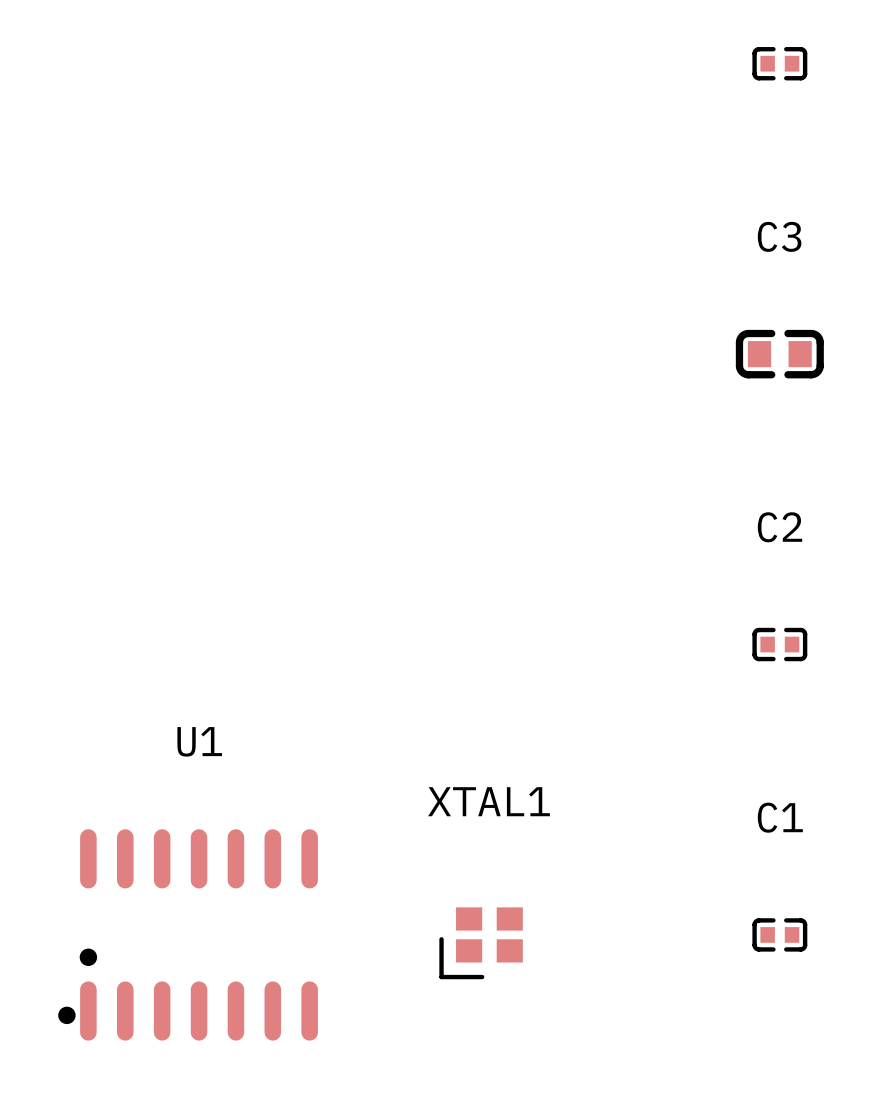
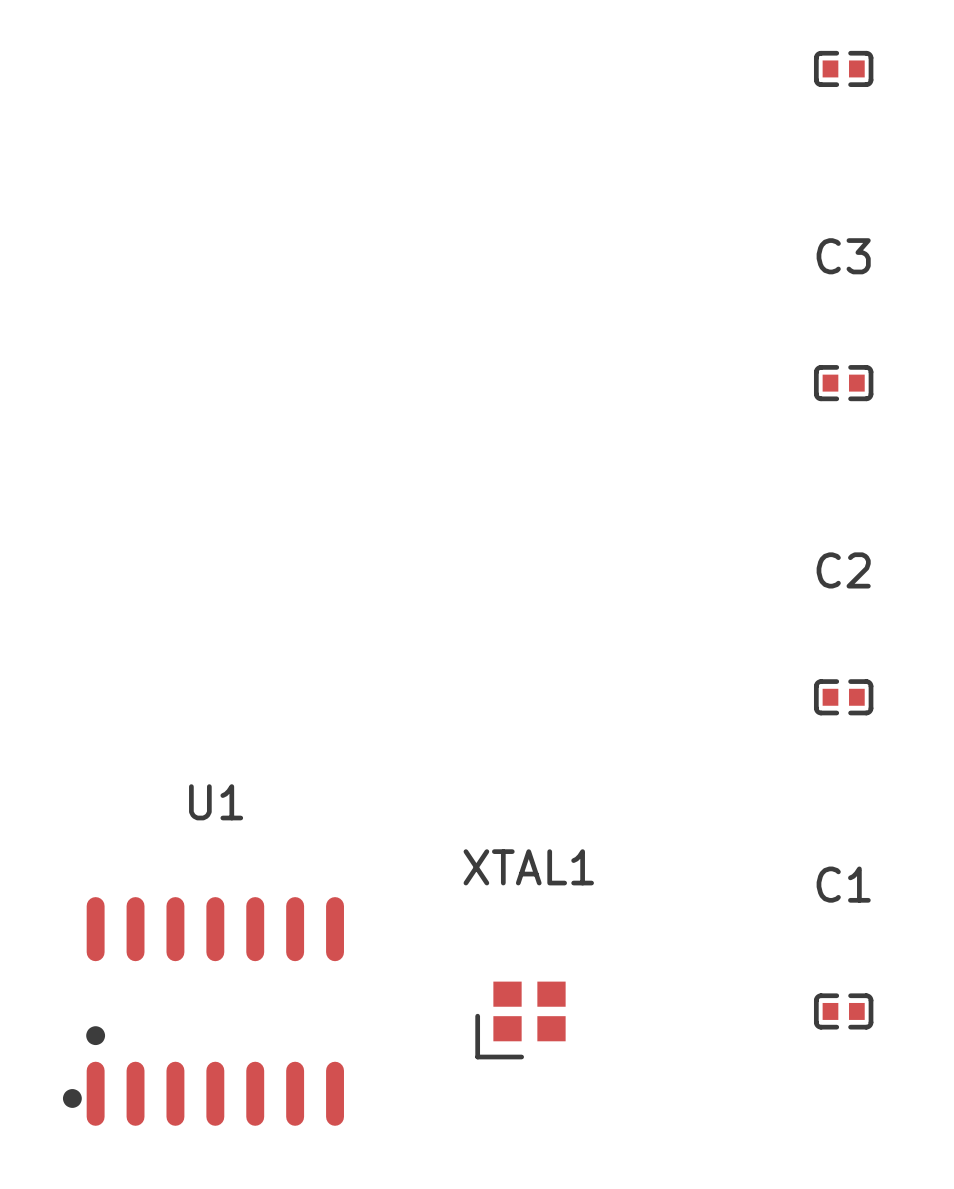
C3 footprint: [735, 329, 824, 379] -> [813, 365, 874, 402]

